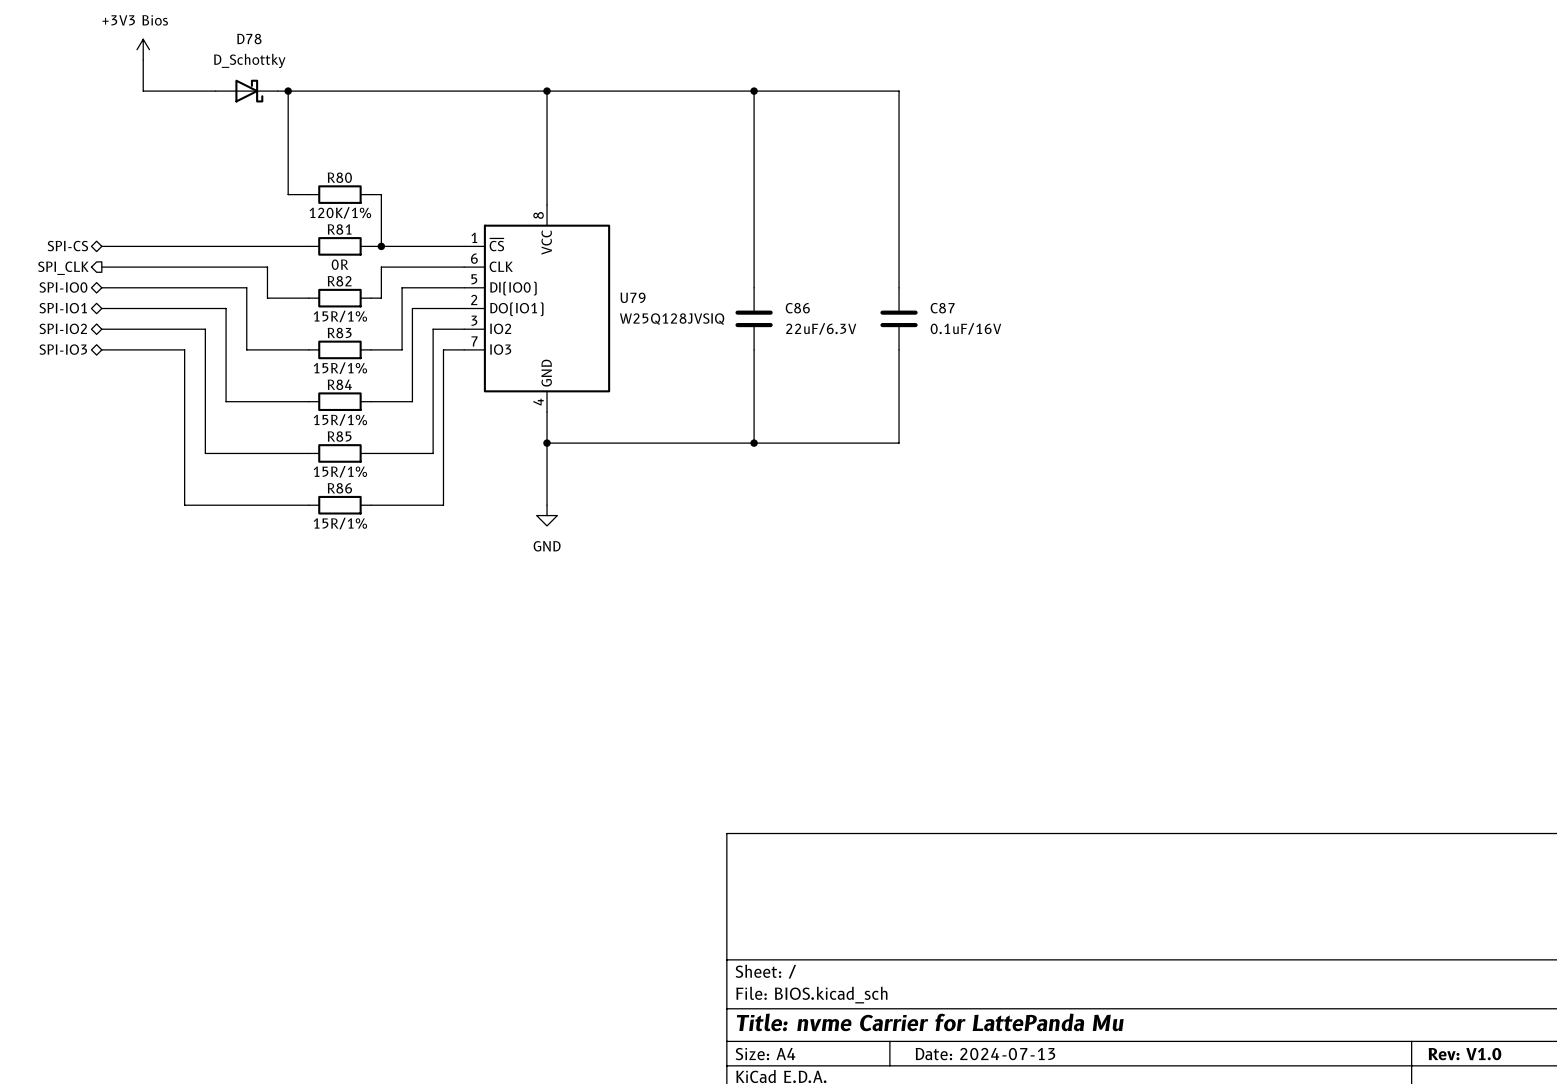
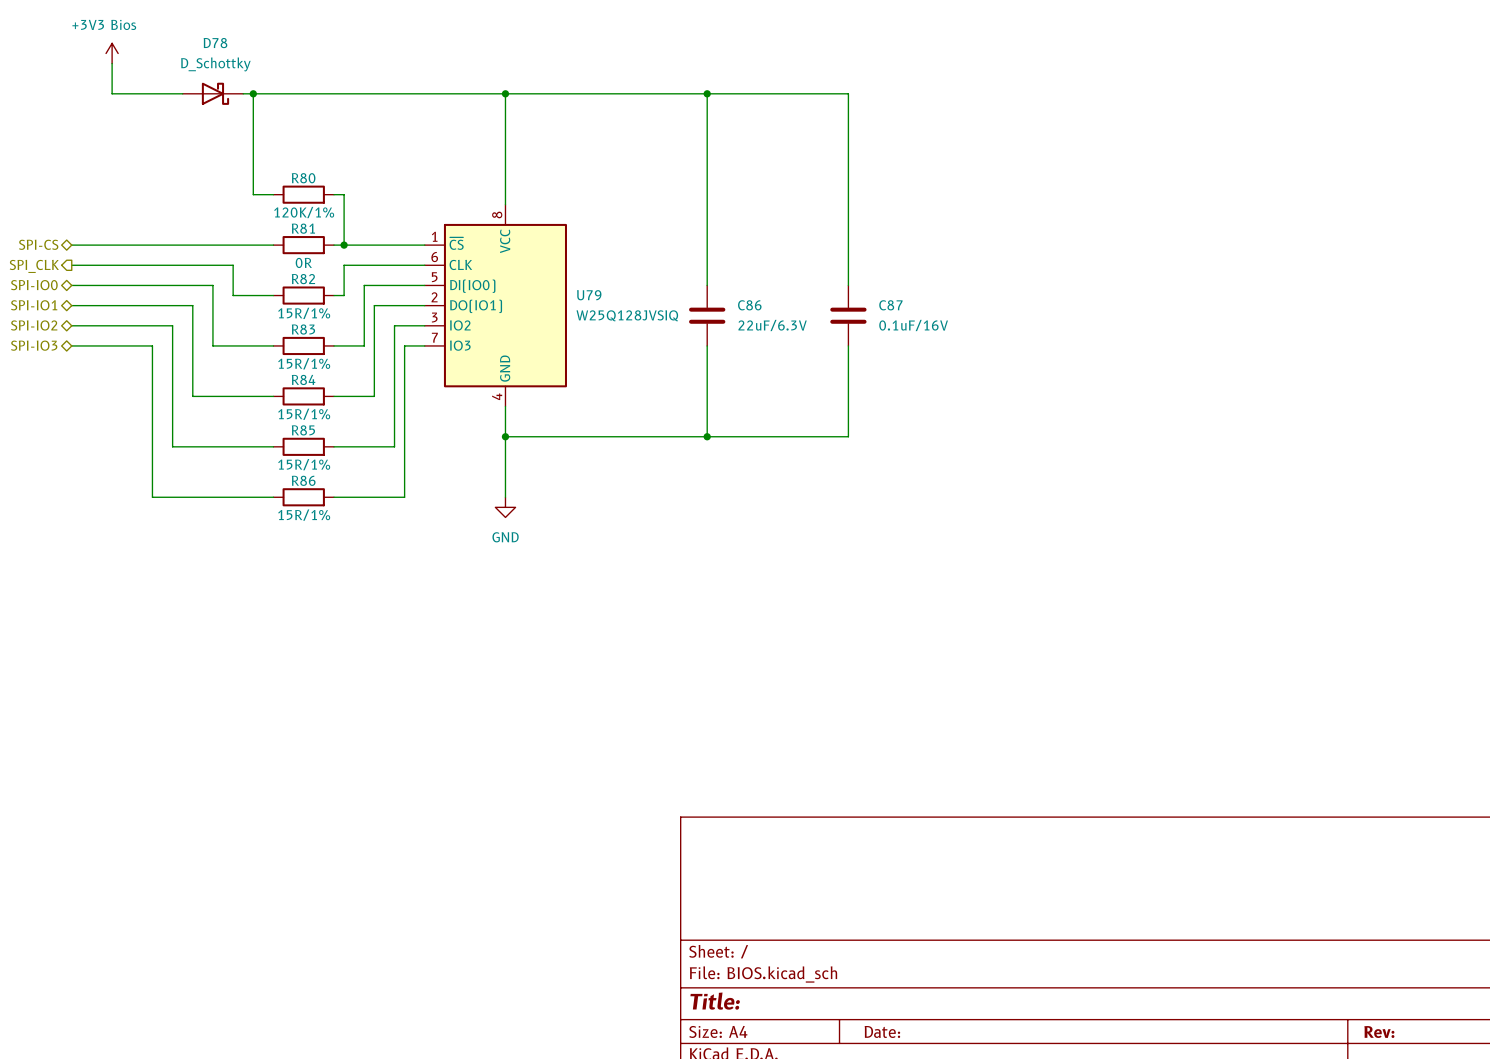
title block: Title: nvme Carrier for LattePanda Mu (930, 1022) -> Title: (715, 1001)
title block: Date: 2024-07-13 (985, 1054) -> Date: (882, 1031)
title block: Rev: V1.0 (1464, 1054) -> Rev: (1379, 1032)

